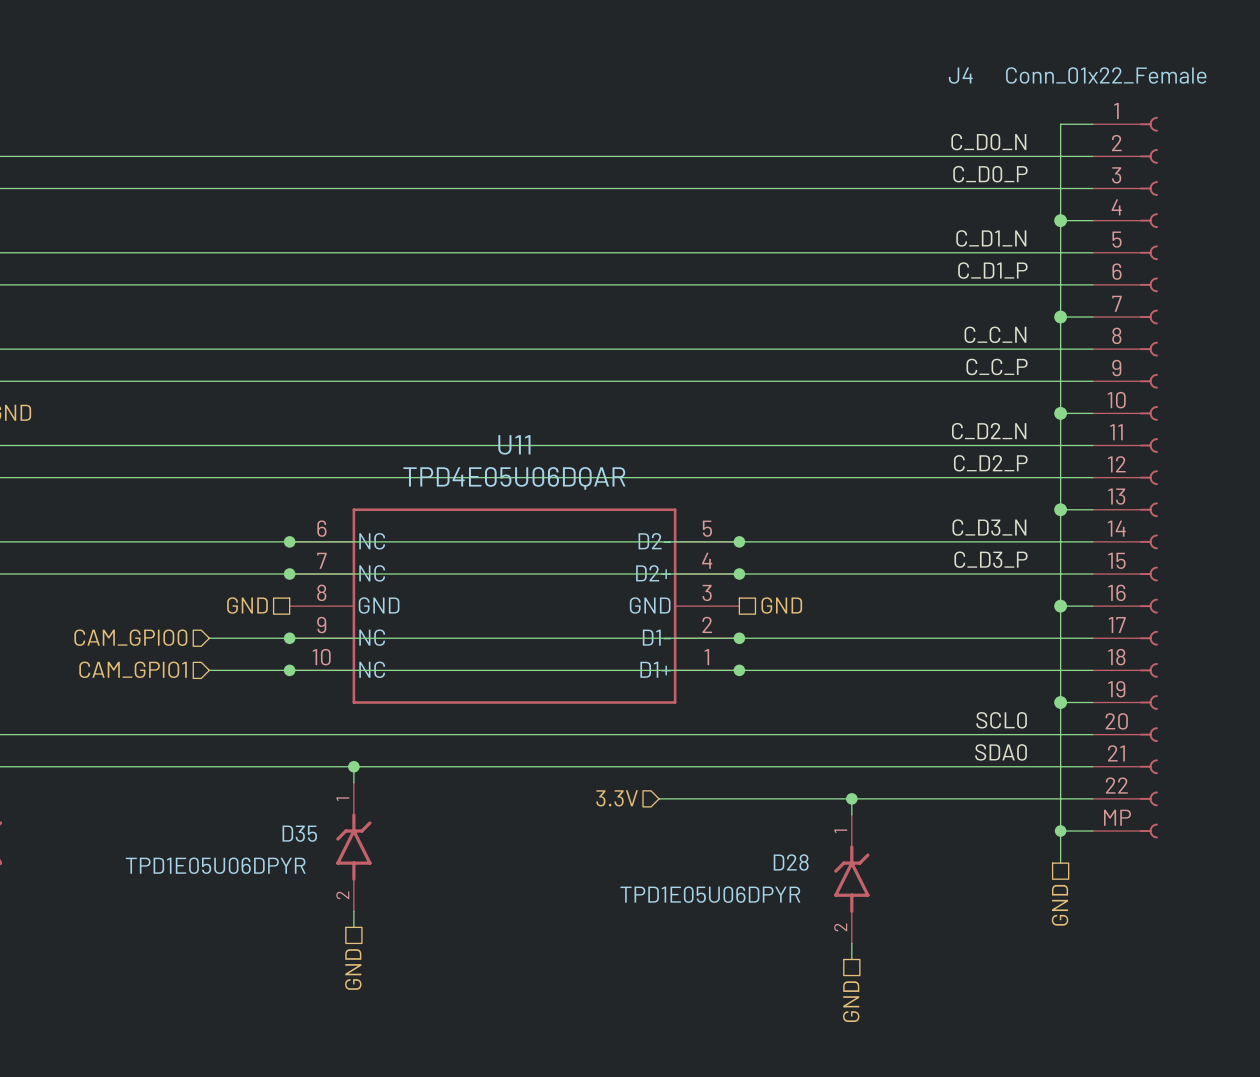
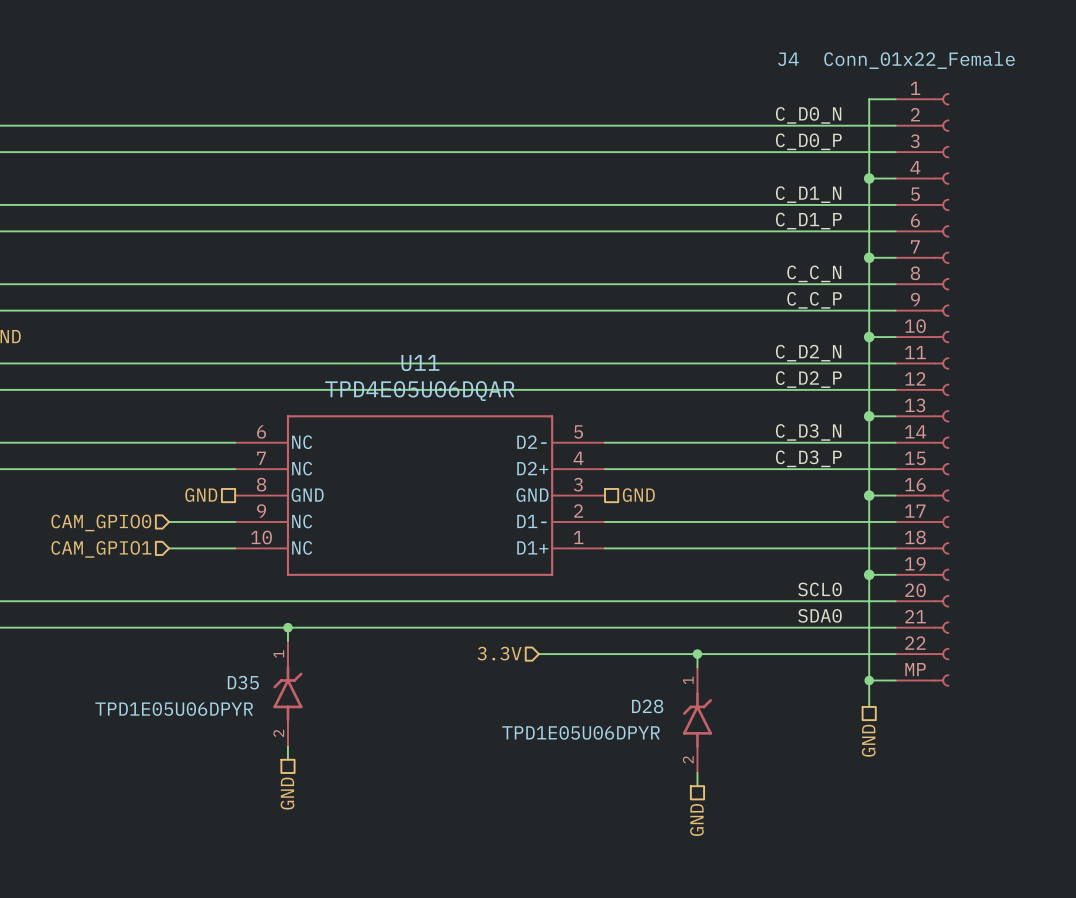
wire: (289, 541) (739, 541) -> none
junction: (289, 541) -> none
junction: (739, 541) -> none
wire: (289, 574) (739, 574) -> none
junction: (289, 574) -> none
junction: (739, 574) -> none
wire: (289, 638) (739, 638) -> none
junction: (289, 638) -> none
junction: (739, 638) -> none
wire: (289, 670) (739, 670) -> none
junction: (289, 670) -> none
junction: (739, 670) -> none

